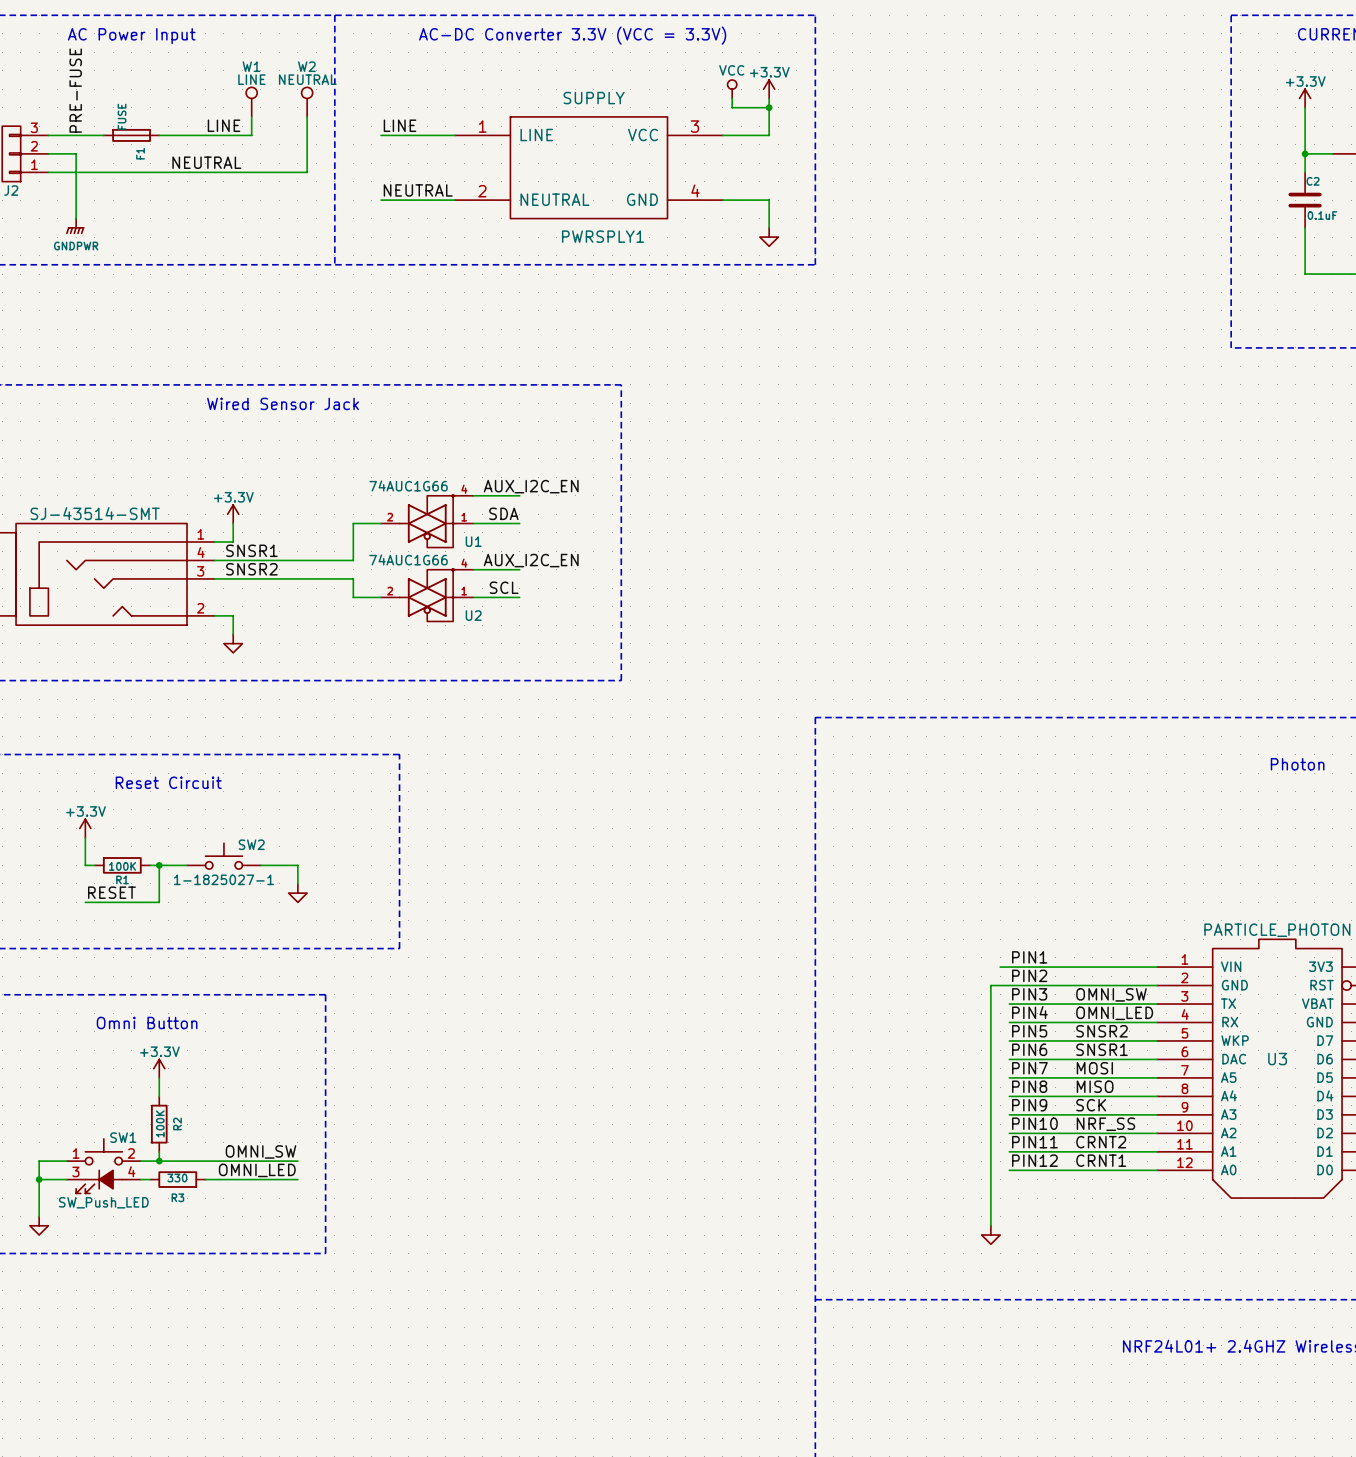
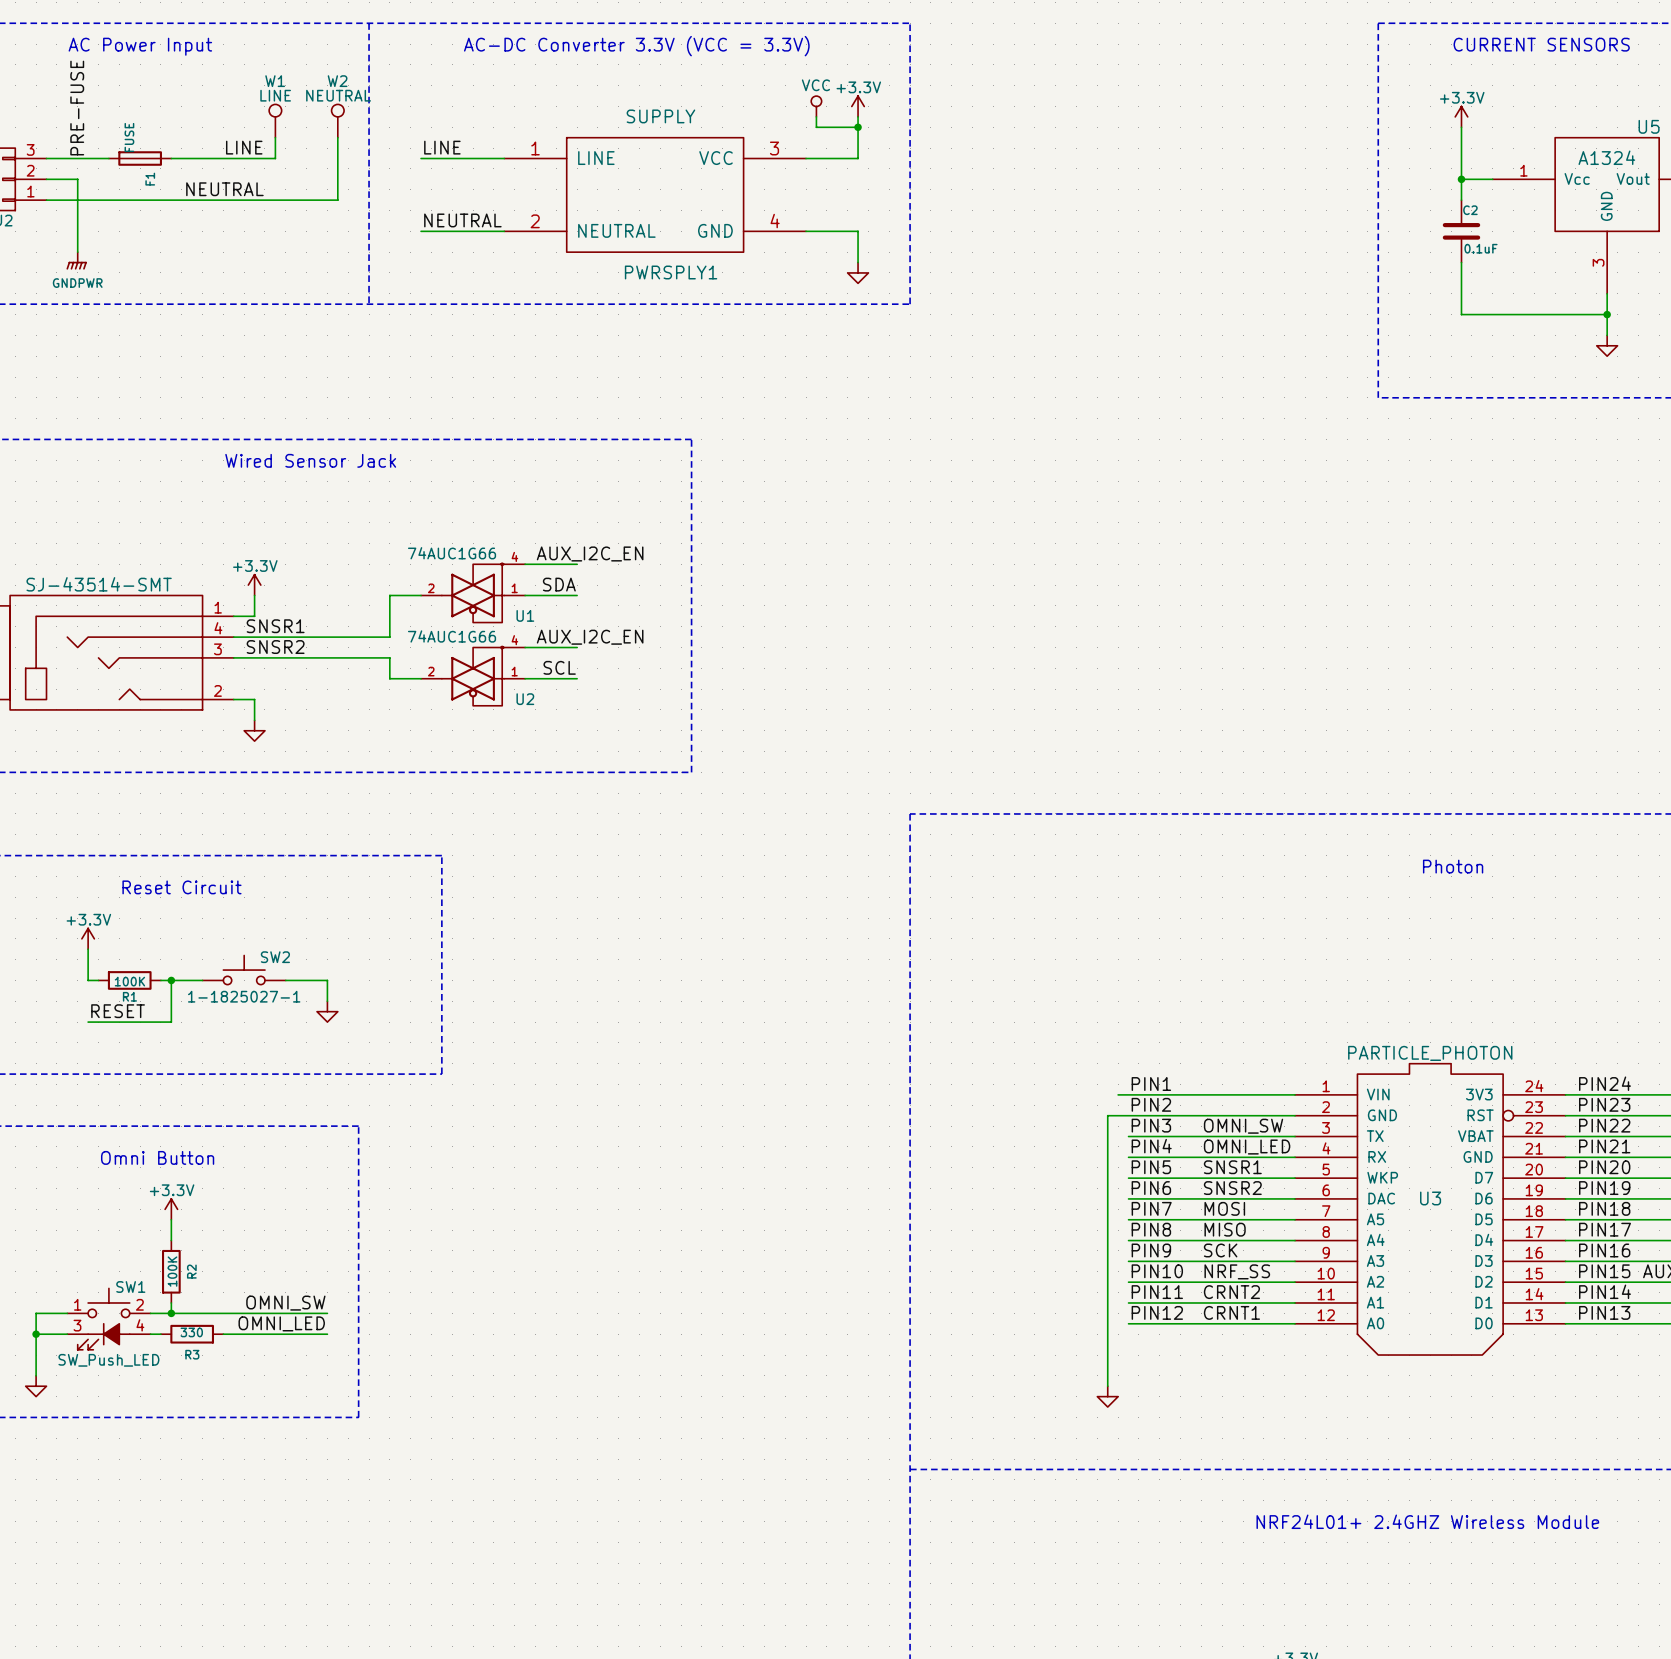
label: SNSR2 (1101, 1031) -> SNSR1 (1232, 1167)
label: SNSR1 (1101, 1049) -> SNSR2 (1232, 1188)

